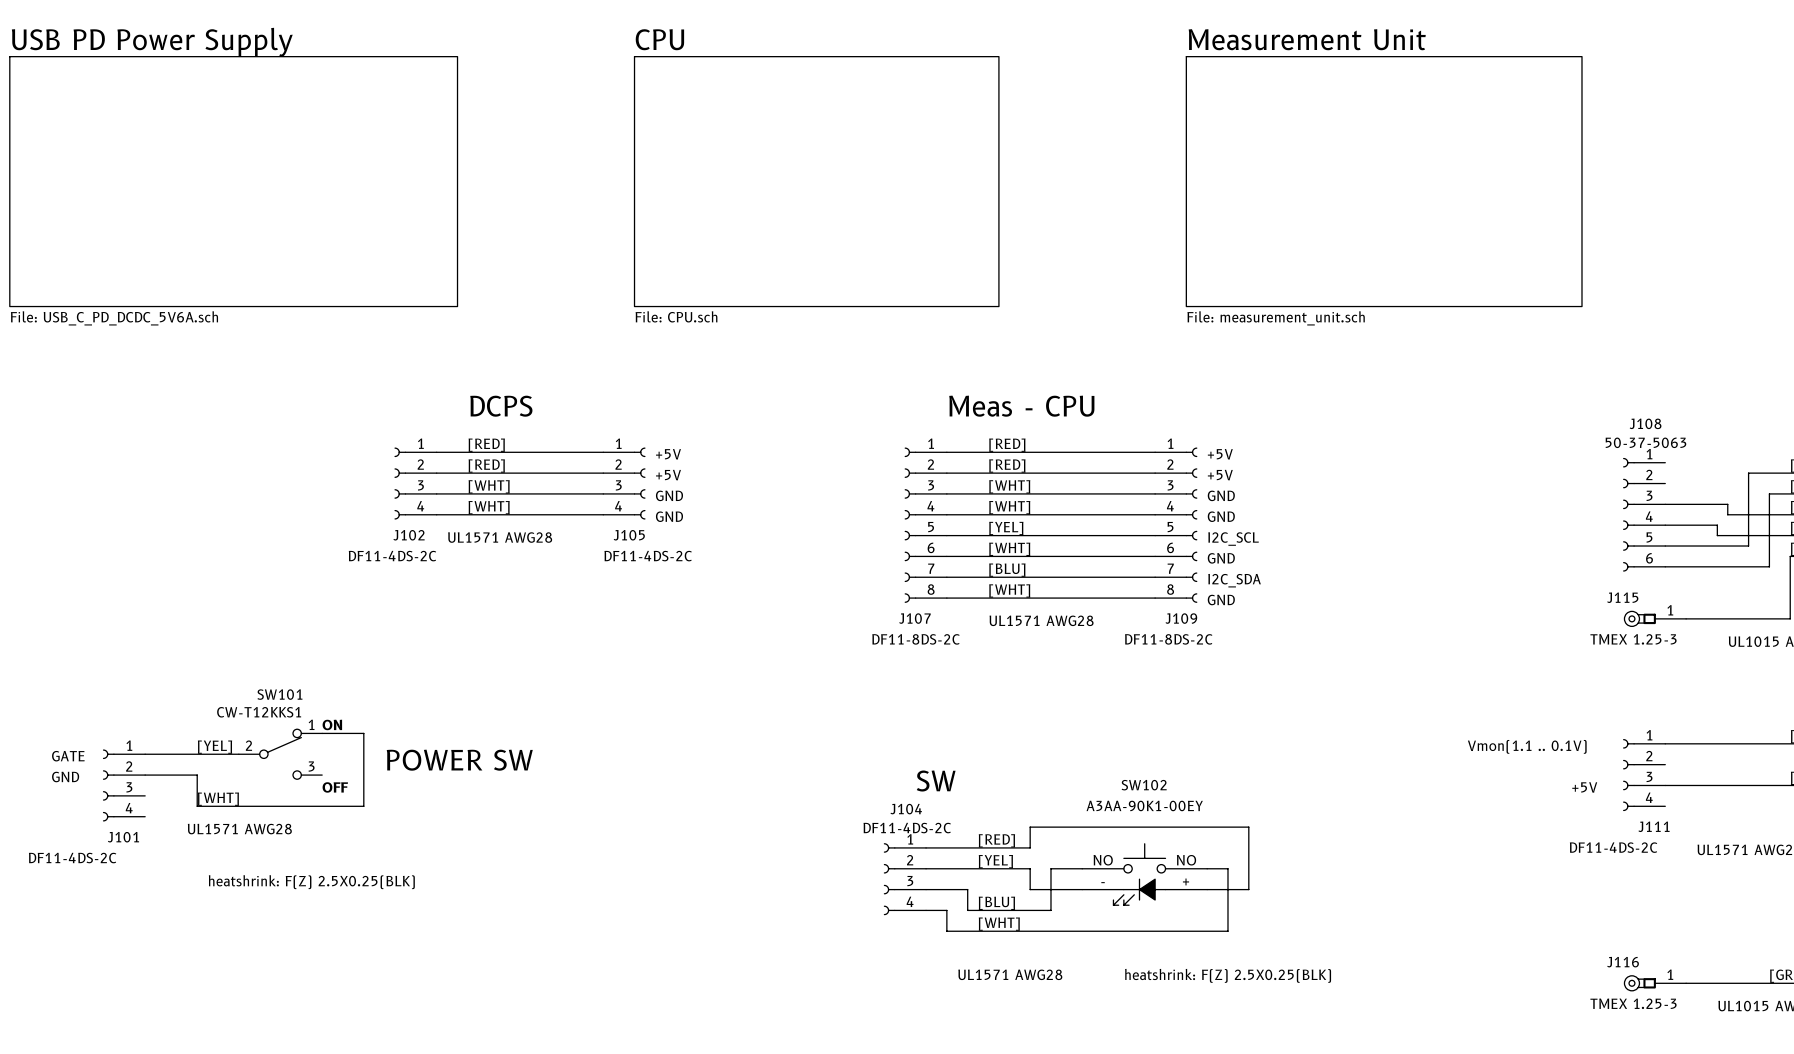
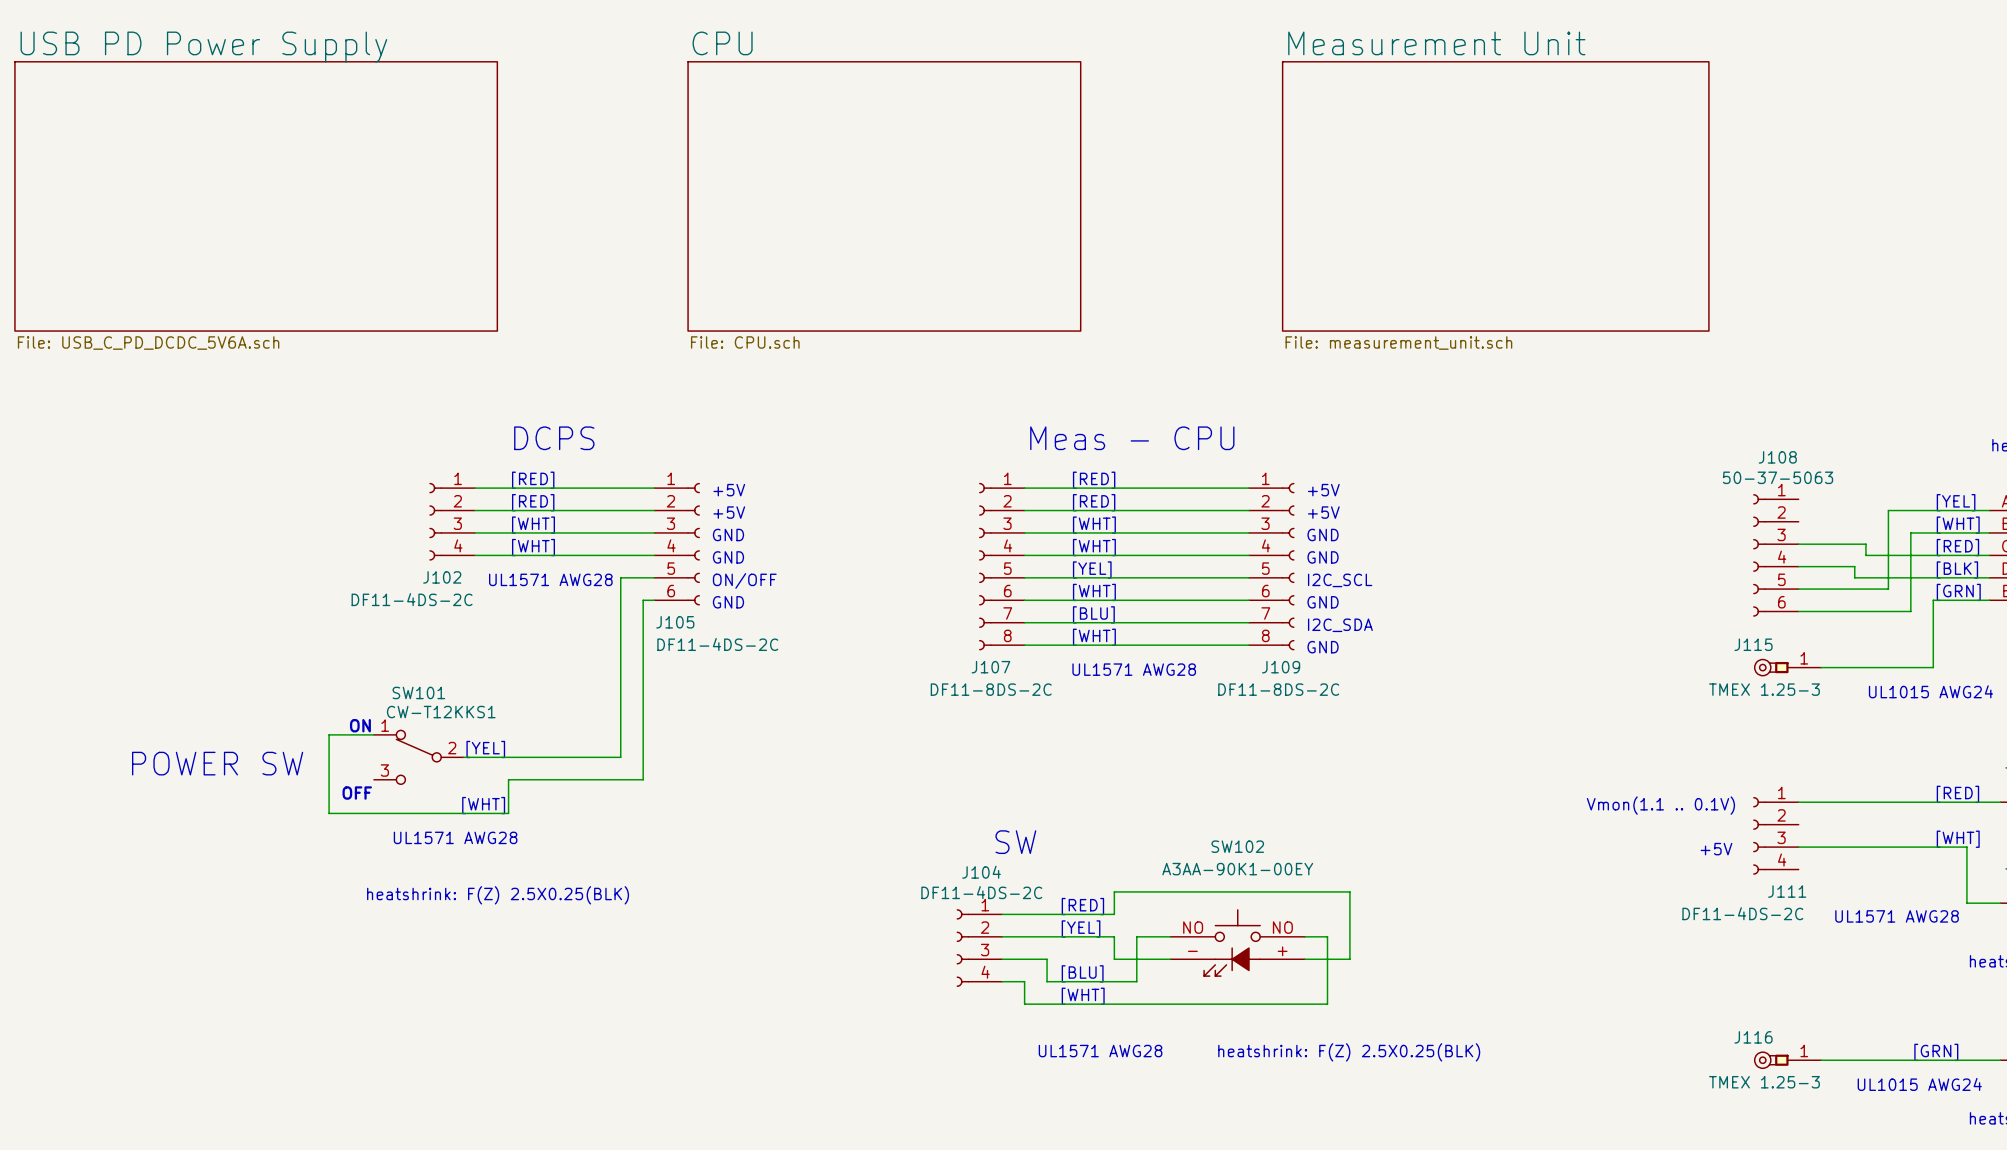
J105 symbol: [603, 447, 646, 520] -> [654, 482, 700, 606]
wire: none -> (654, 577) (620, 577) (620, 757) (463, 757)
J105 name position: J105 (629, 535) -> J105 (675, 622)
text: none -> ON/OFF (744, 580)
wire: none -> (654, 600) (643, 600) (643, 779) (508, 779) (508, 813) (329, 813) (329, 734) (373, 734)
J105 value position: DF11-4DS-2C (648, 556) -> DF11-4DS-2C (717, 644)
text: none -> GND (728, 602)
text: none -> [YEL] (485, 749)
text position: ON (332, 724) -> ON (360, 725)
wire: (322, 733) (363, 733) (363, 806) (197, 806) (197, 775) (145, 775) -> none
text: [YEL] (215, 747) -> none
text: none -> [WHT] (483, 805)
wire: (145, 754) (238, 754) -> none
SW101 flip: as is (280, 754) -> left-right (418, 757)
SW101 position: (280, 754) -> (418, 757)
text: GATE (68, 756) -> none
text position: POWER SW (459, 760) -> POWER SW (217, 763)
text: GND (65, 777) -> none
text: none -> UL1571 AWG28 (455, 837)
J101: DF11-4DS-2C (124, 785) -> none
text position: OFF (335, 787) -> OFF (357, 793)
text: [WHT] (218, 799) -> none
text: UL1571 AWG28 (239, 829) -> none
text: none -> heatshrink: F(Z) 2.5X0.25(BLK) (498, 895)
text: heatshrink: F(Z) 2.5X0.25(BLK) (311, 882) -> none

